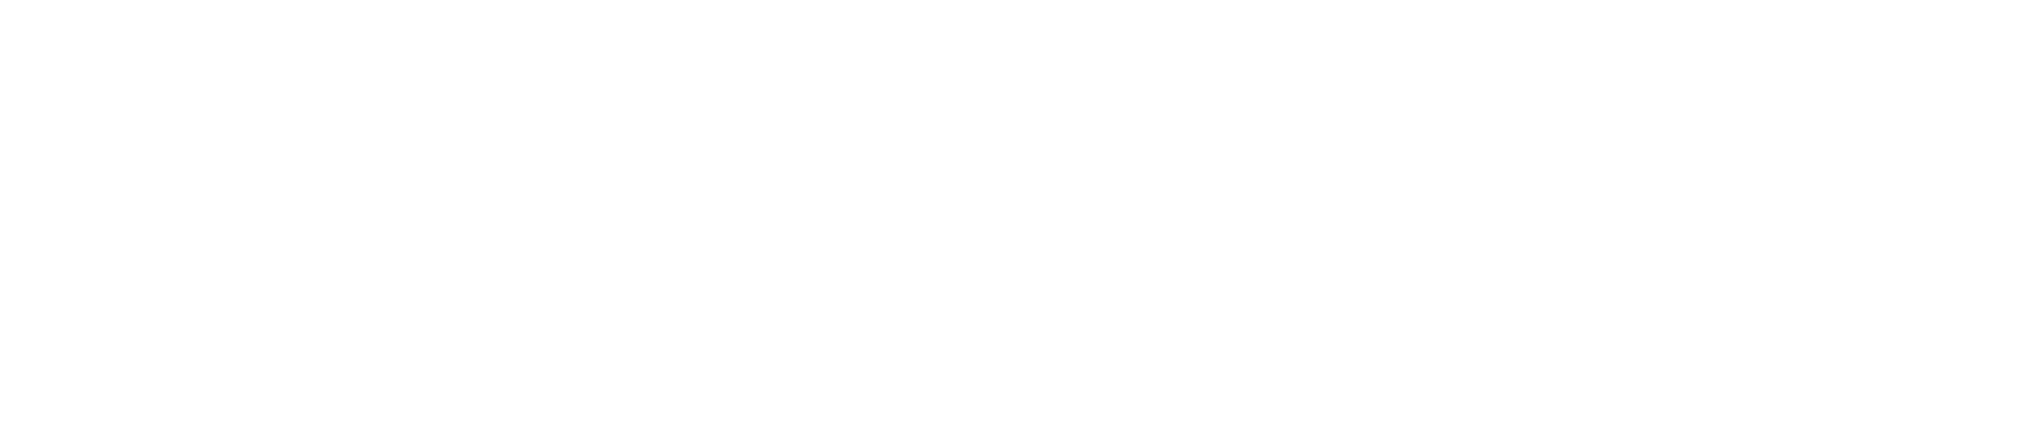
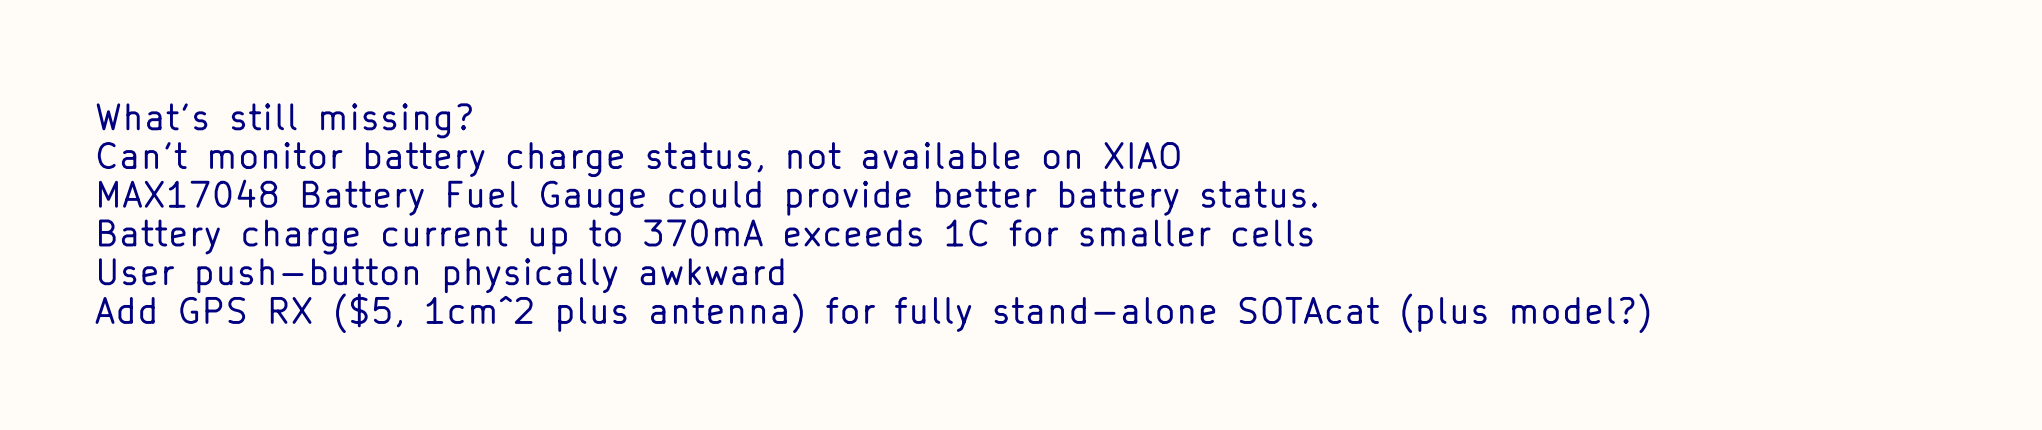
text: none -> What's still missing? (284, 120)
text: none -> Can't monitor battery charge status, not available on XIAO (638, 159)
text: none -> MAX17048 Battery Fuel Gauge could provide better battery status. (708, 197)
text: none -> Battery charge current up to 370mA exceeds 1C for smaller cells (705, 236)
text: none -> User push-button physically awkward (441, 275)
text: none -> Add GPS RX ($5, 1cm^2 plus antenna) for fully stand-alone SOTAcat (plus model?) (872, 313)

